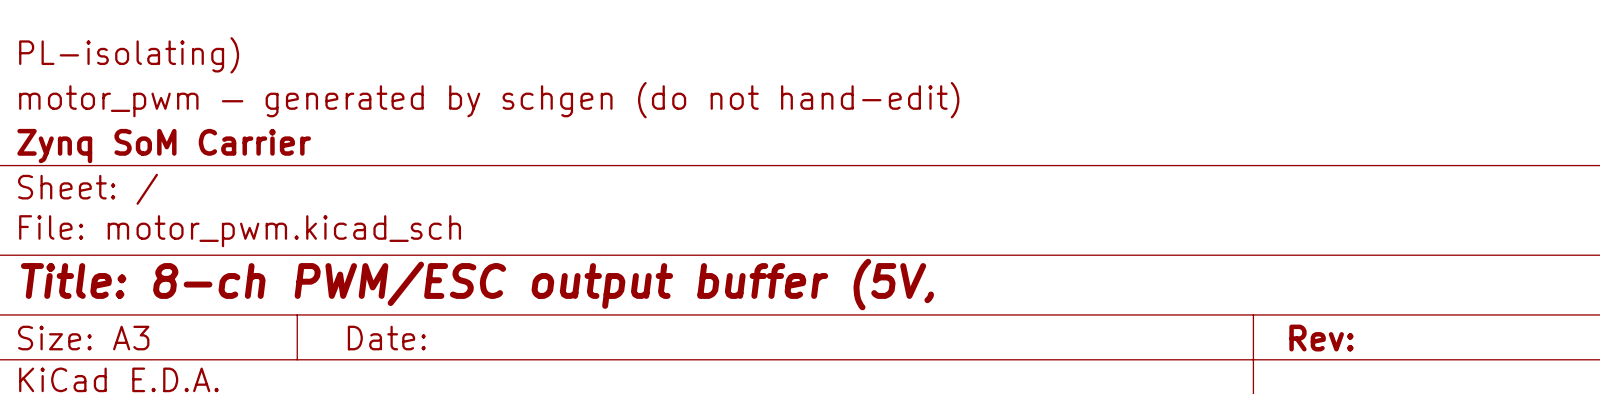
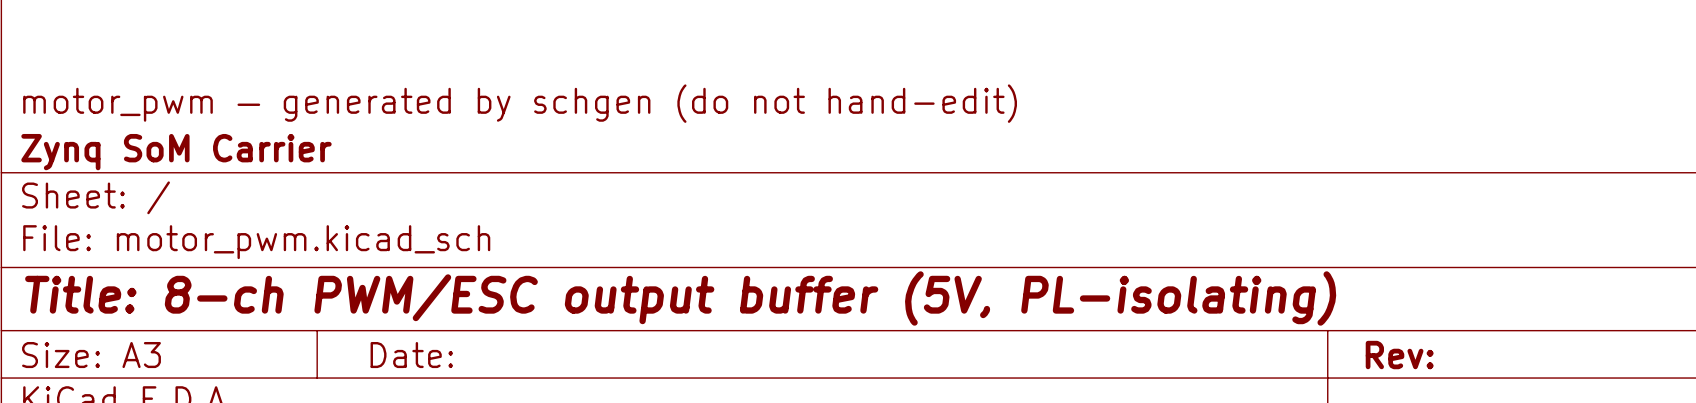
title block: PL-isolating) (129, 55) -> none
title block: Title: 8-ch PWM/ESC output buffer (5V, (477, 284) -> Title: 8-ch PWM/ESC output buffer (5V, PL-isolating) (680, 298)

